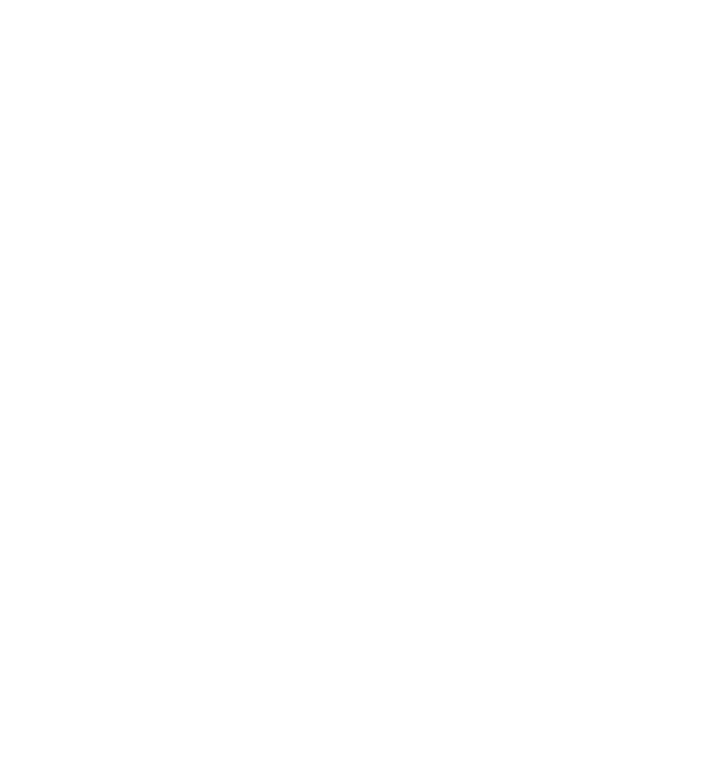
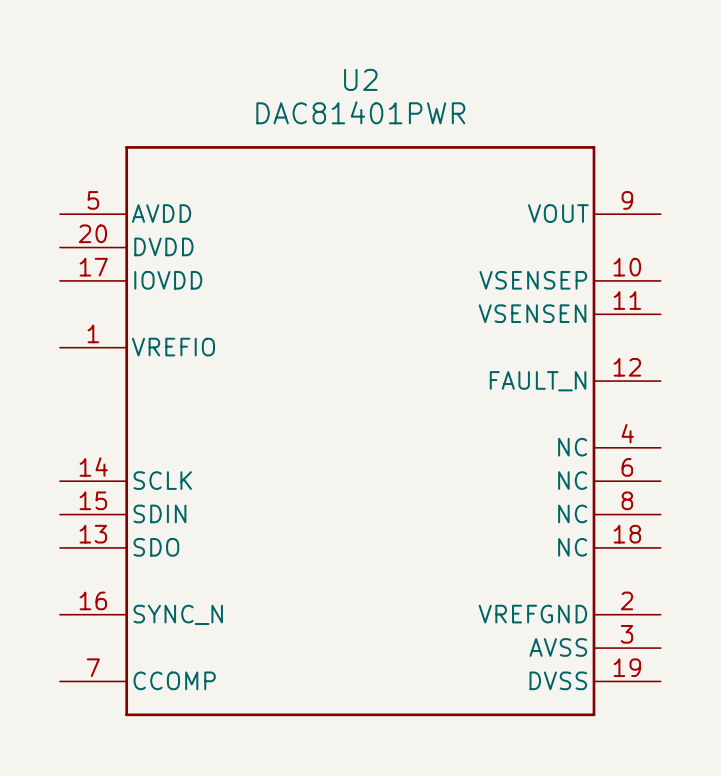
U2: none -> DAC81401PWR (360, 431)

